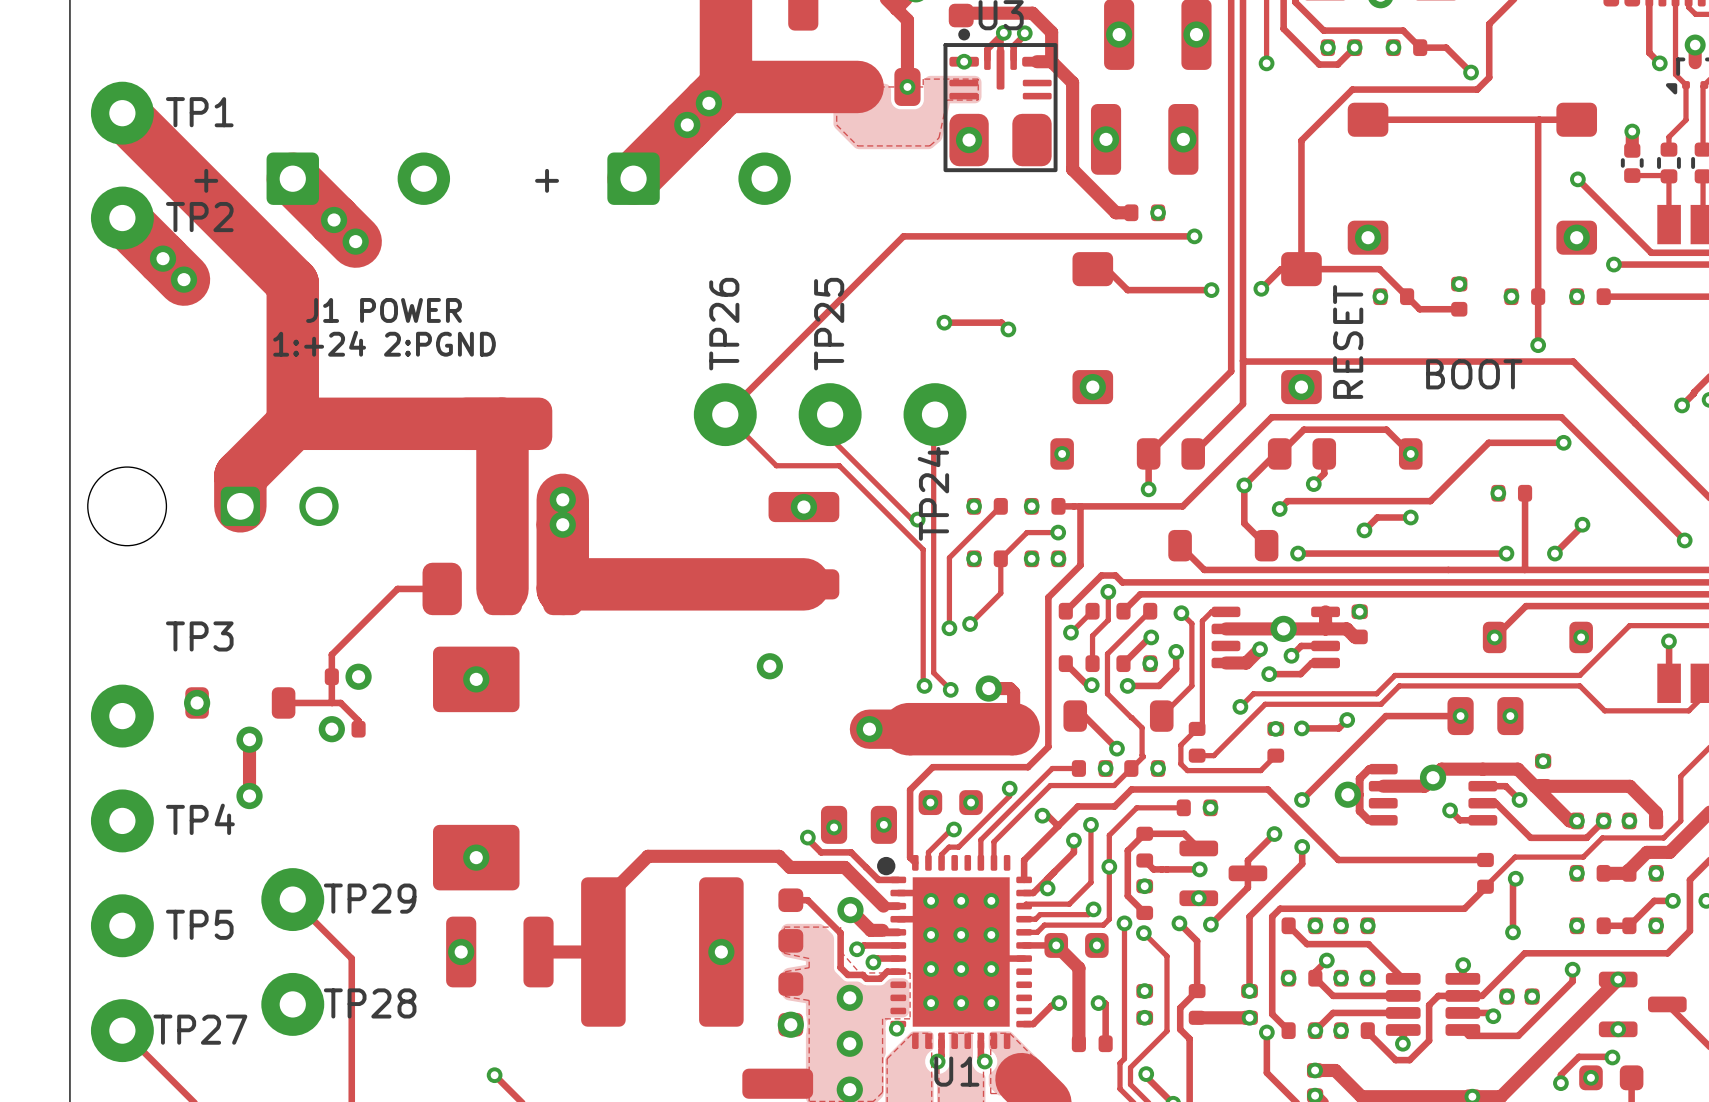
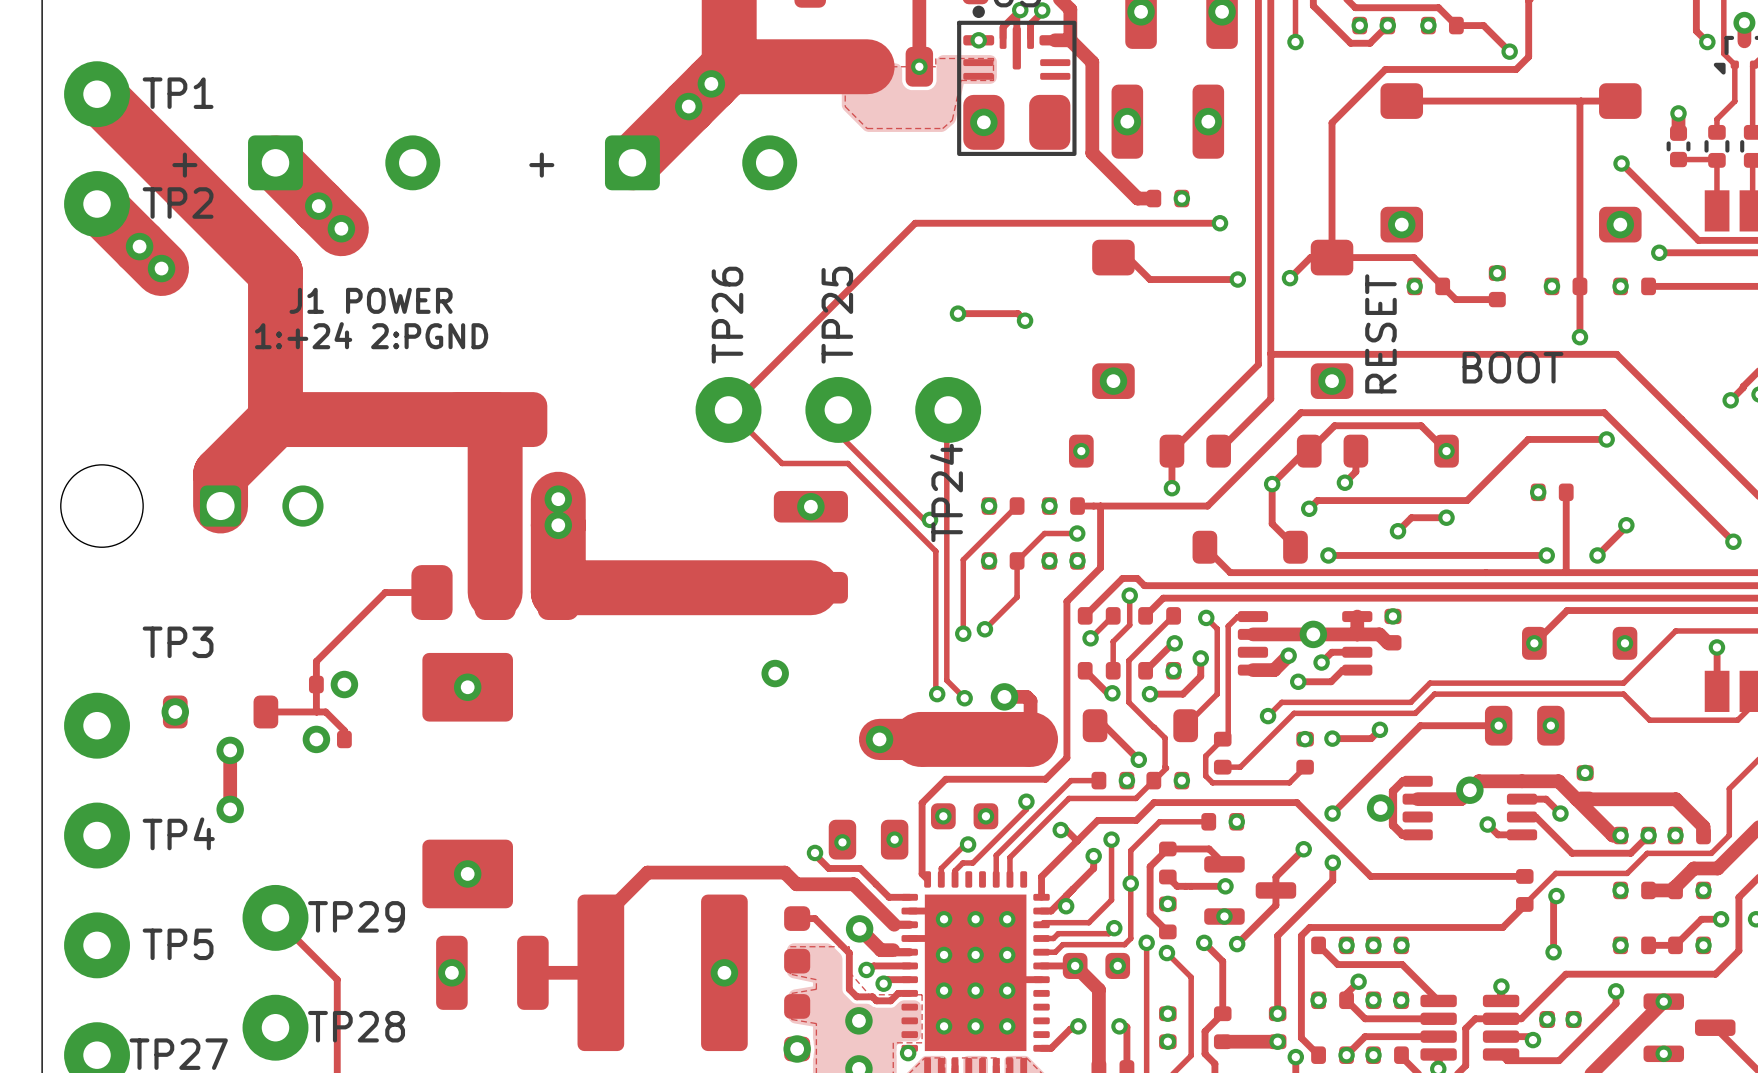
drawing: [877, 856, 896, 876] -> none

